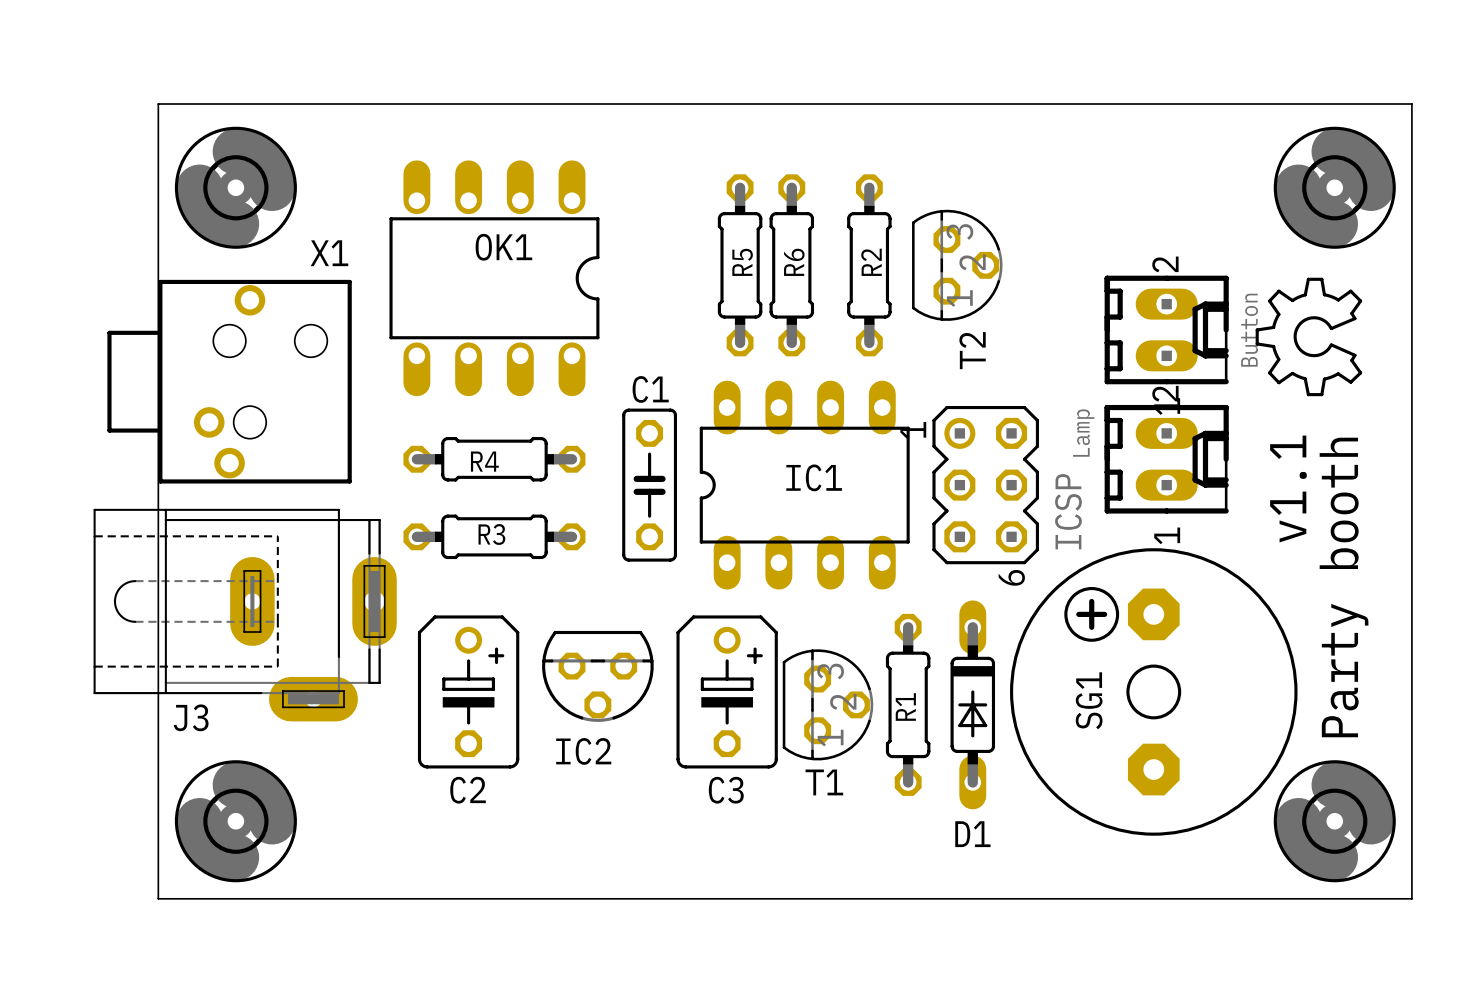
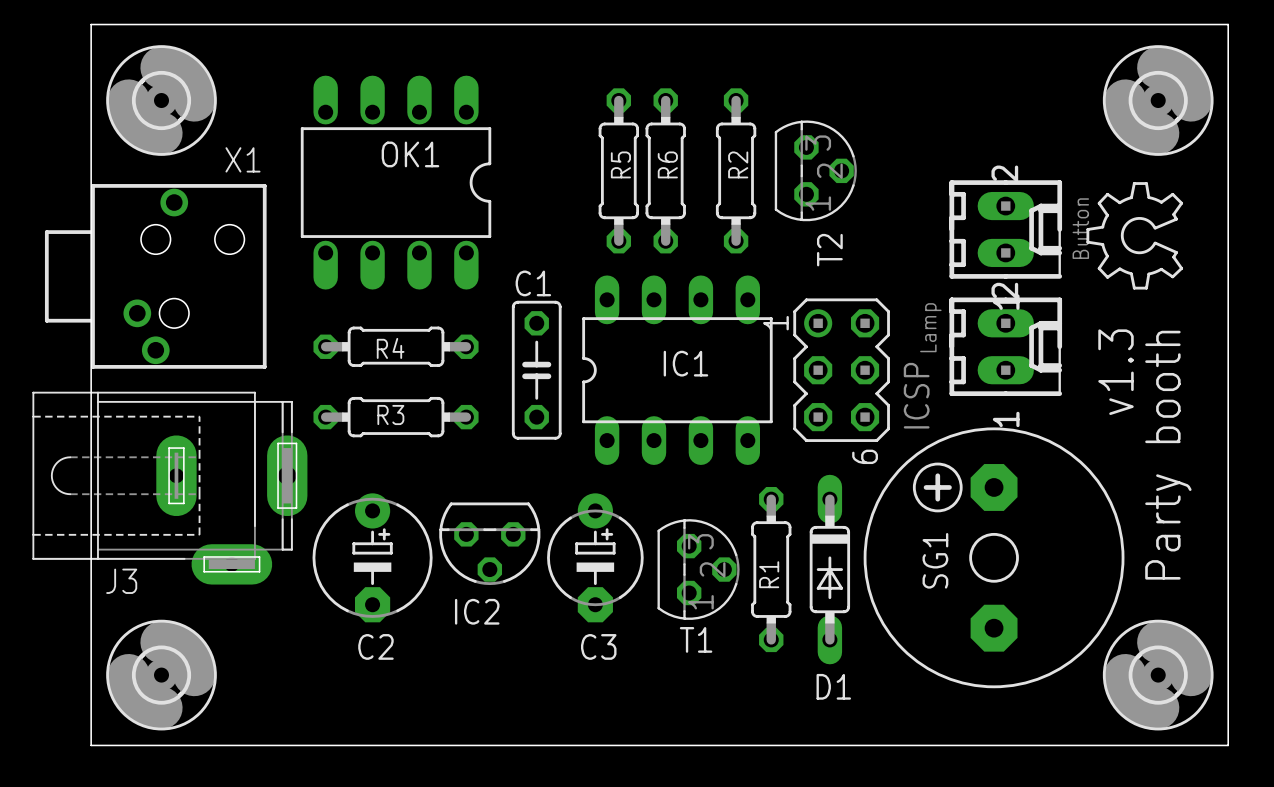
text: v1.1 (1288, 489) -> v1.3 (1116, 372)
C2 footprint: [417, 615, 520, 769] -> [312, 493, 433, 623]
C3 footprint: [676, 615, 778, 769] -> [547, 493, 644, 623]

